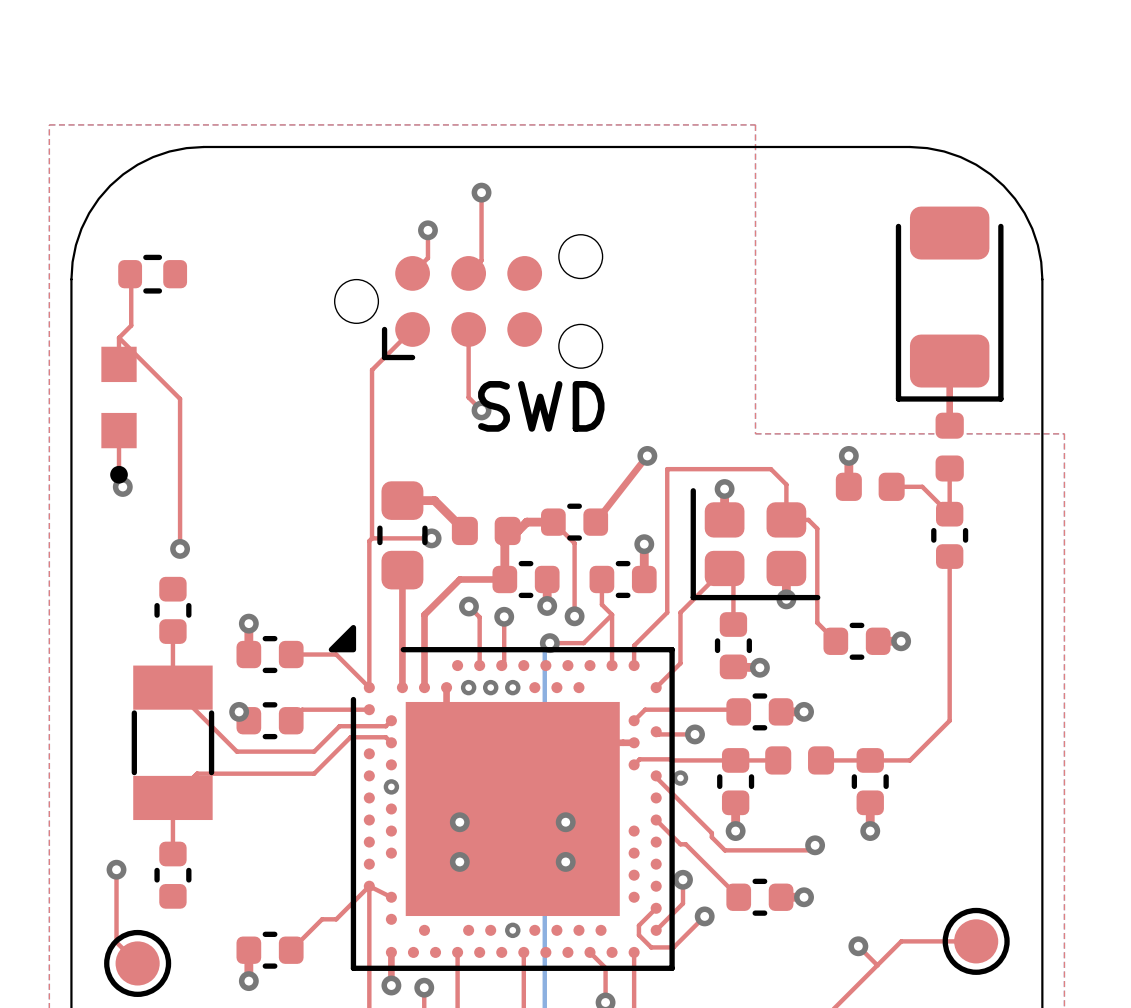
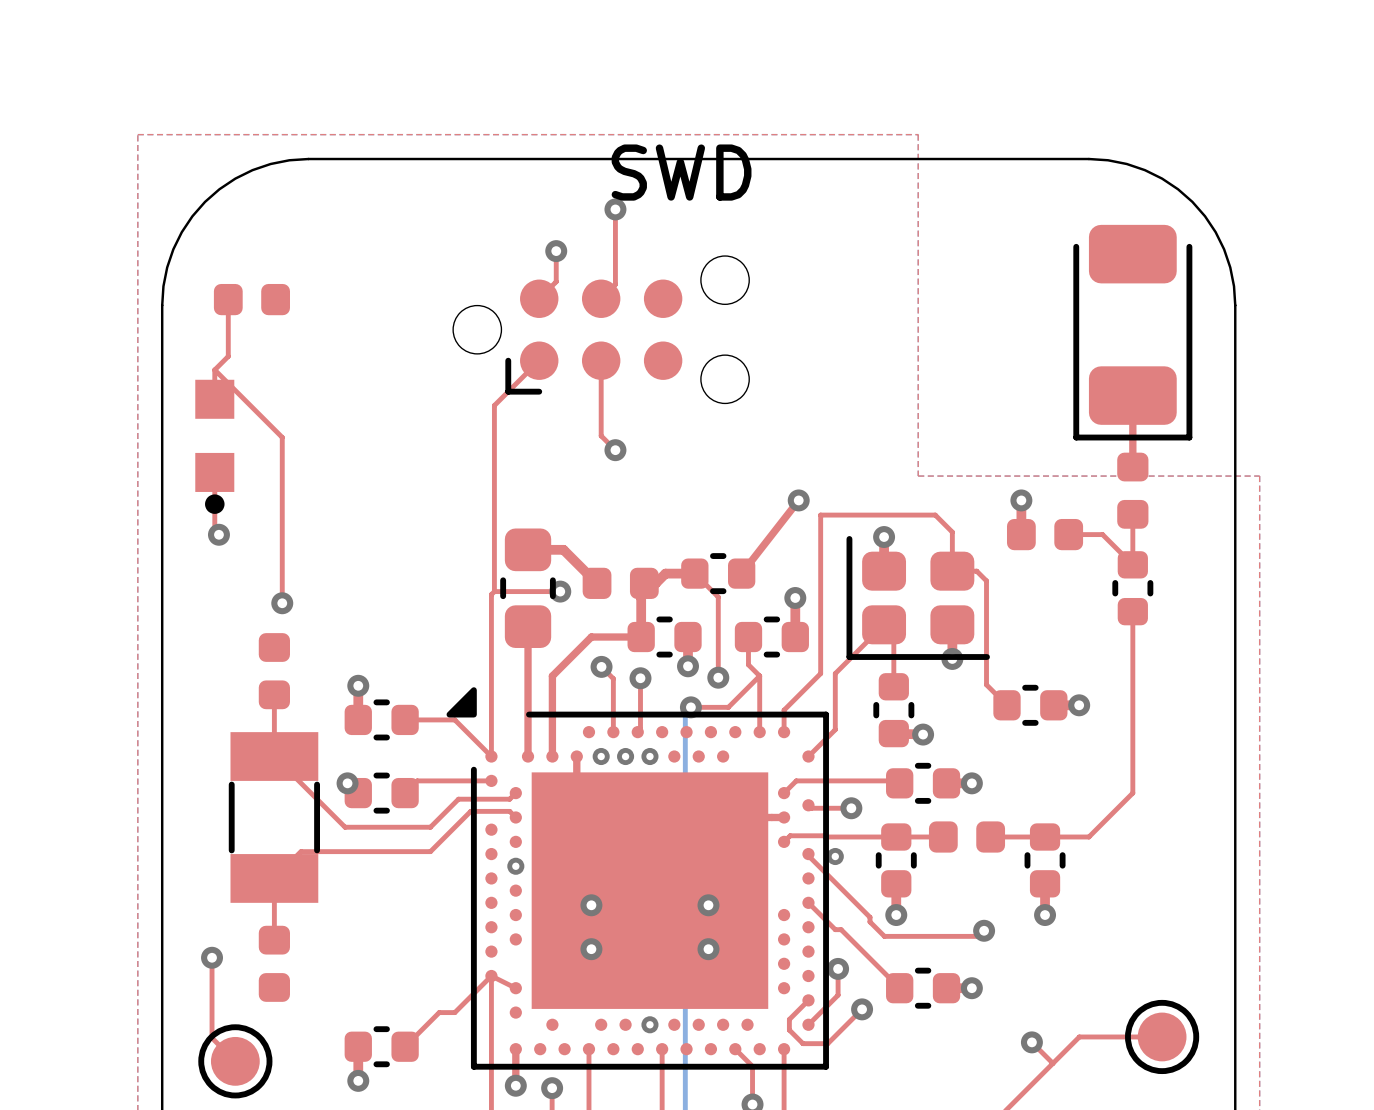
part footprint: [118, 254, 188, 294] -> [213, 283, 290, 316]
part footprint: [101, 346, 137, 484] -> [195, 379, 235, 514]
text position: SWD (541, 406) -> SWD (681, 172)
part footprint: [154, 576, 192, 644] -> [258, 633, 290, 710]
part footprint: [154, 841, 192, 909] -> [258, 925, 290, 1002]

